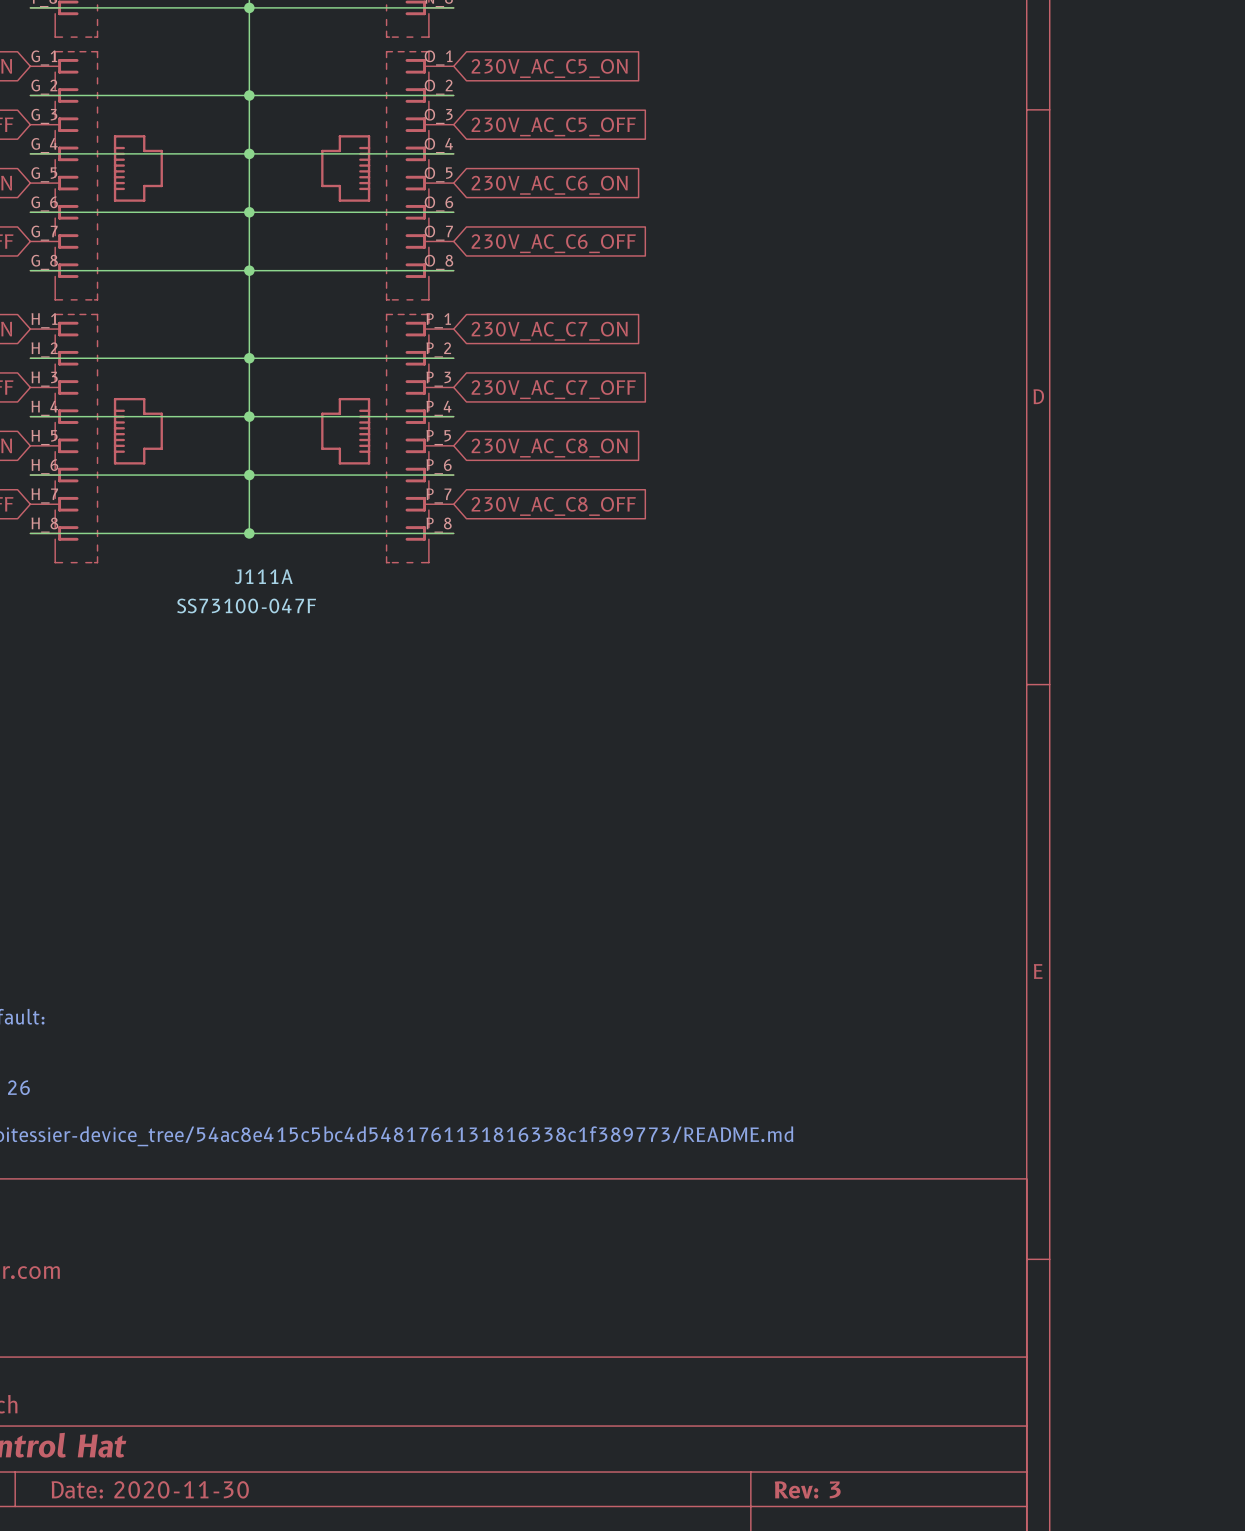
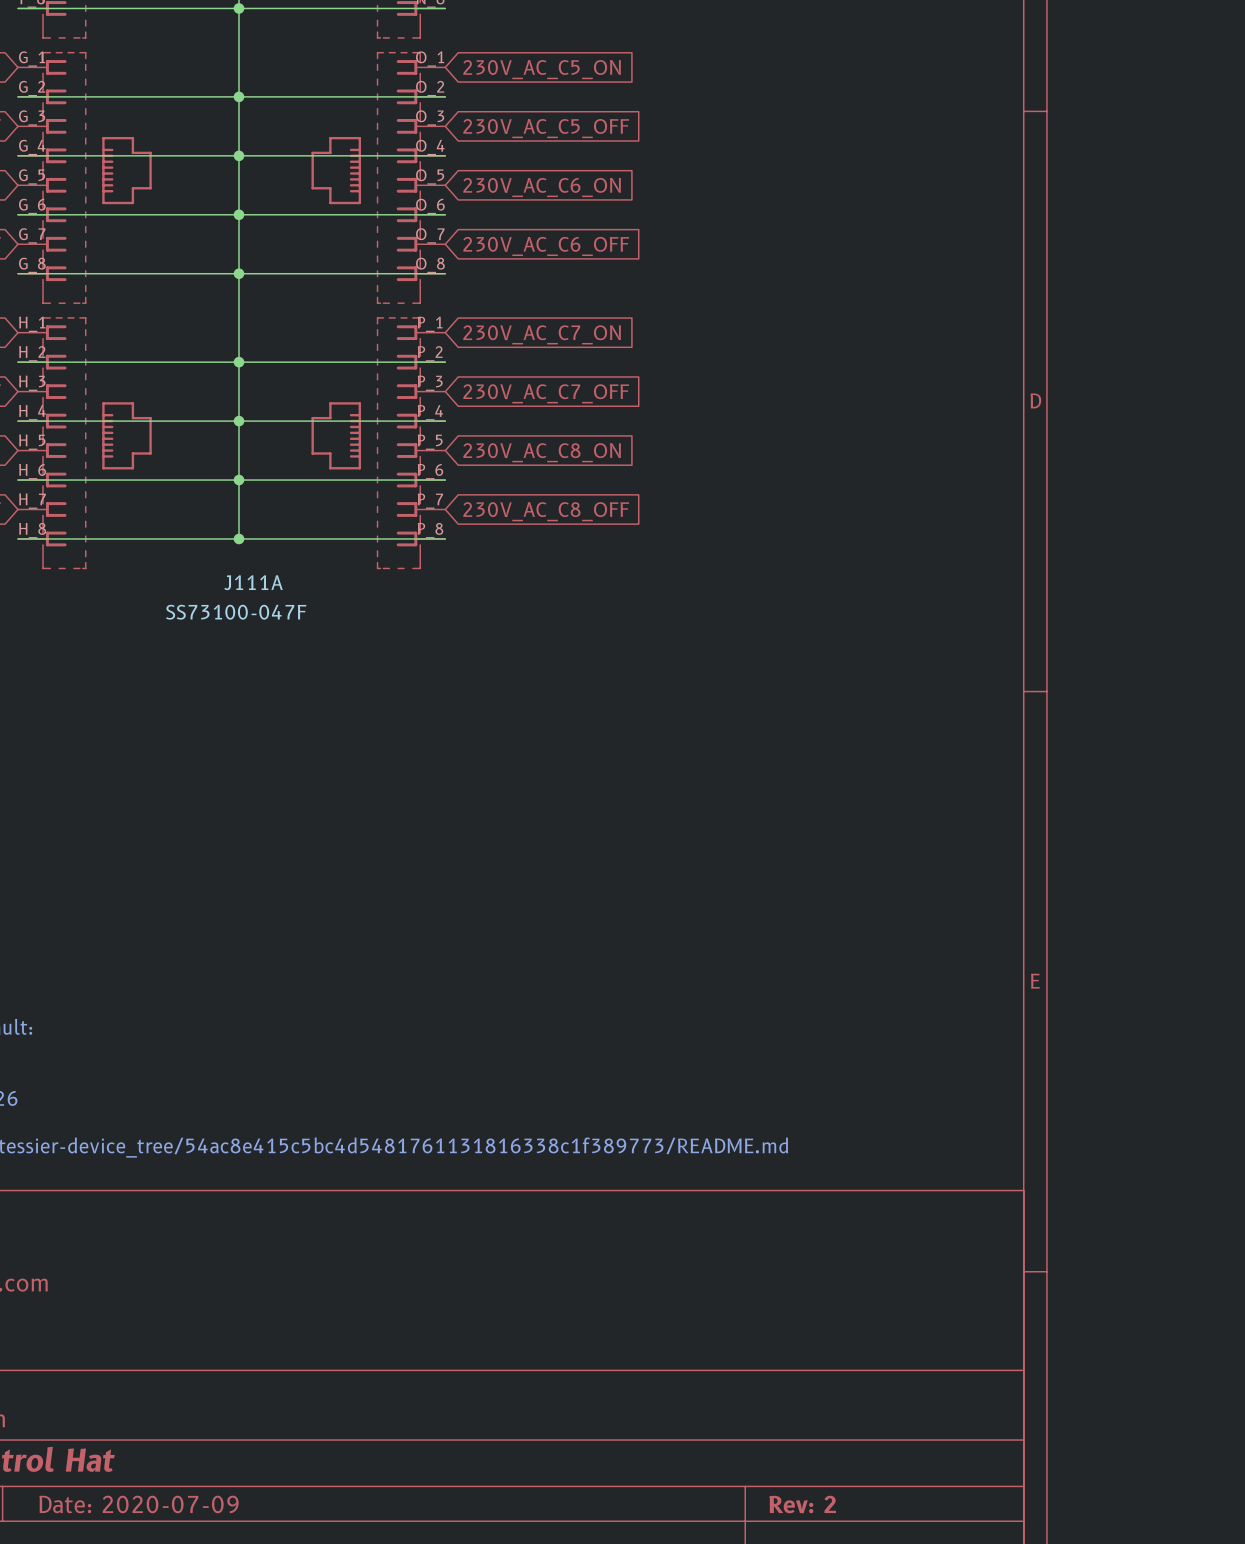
title block: Date: 2020-11-30 (150, 1489) -> Date: 2020-07-09 (139, 1504)
title block: Rev: 3 (807, 1489) -> Rev: 2 (802, 1504)

